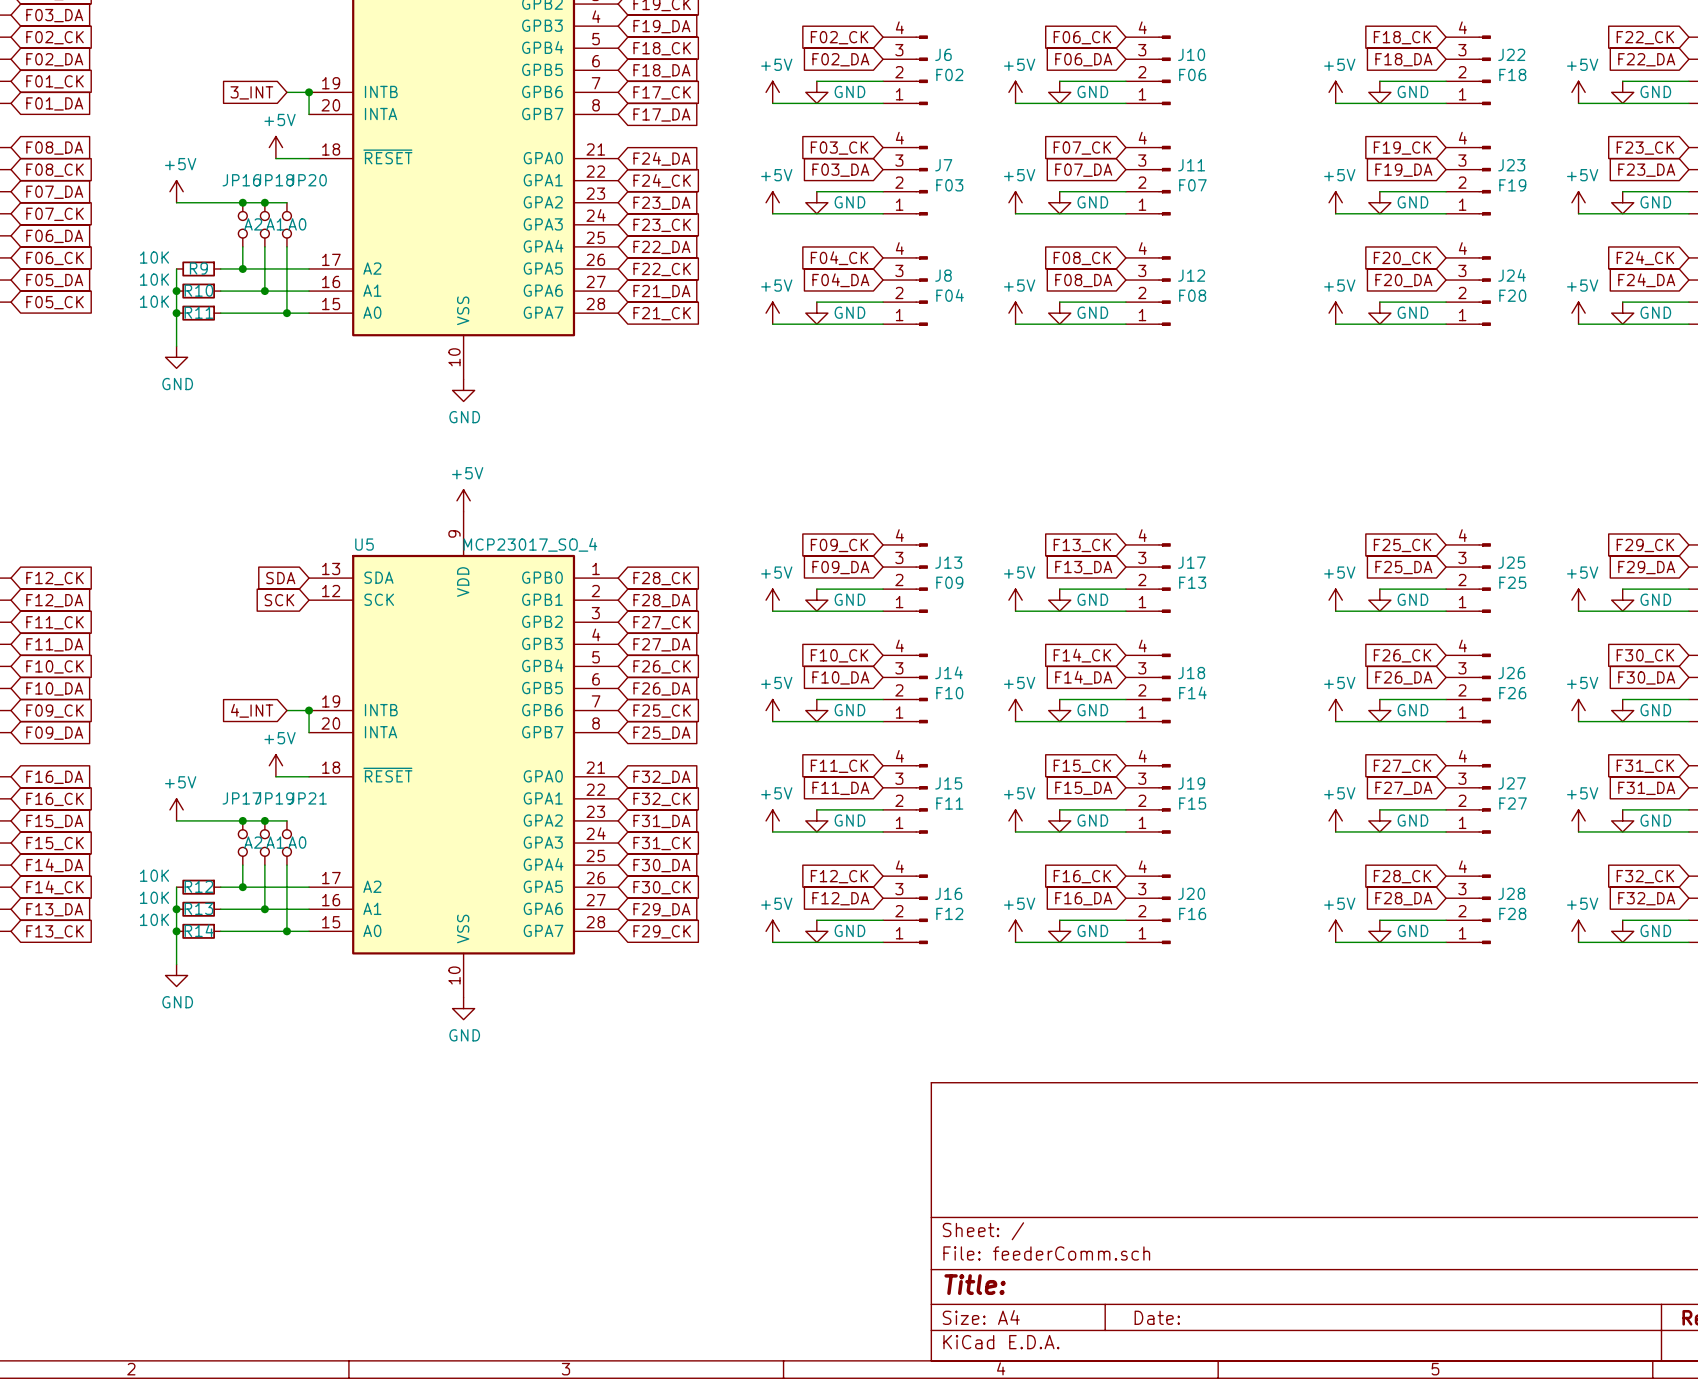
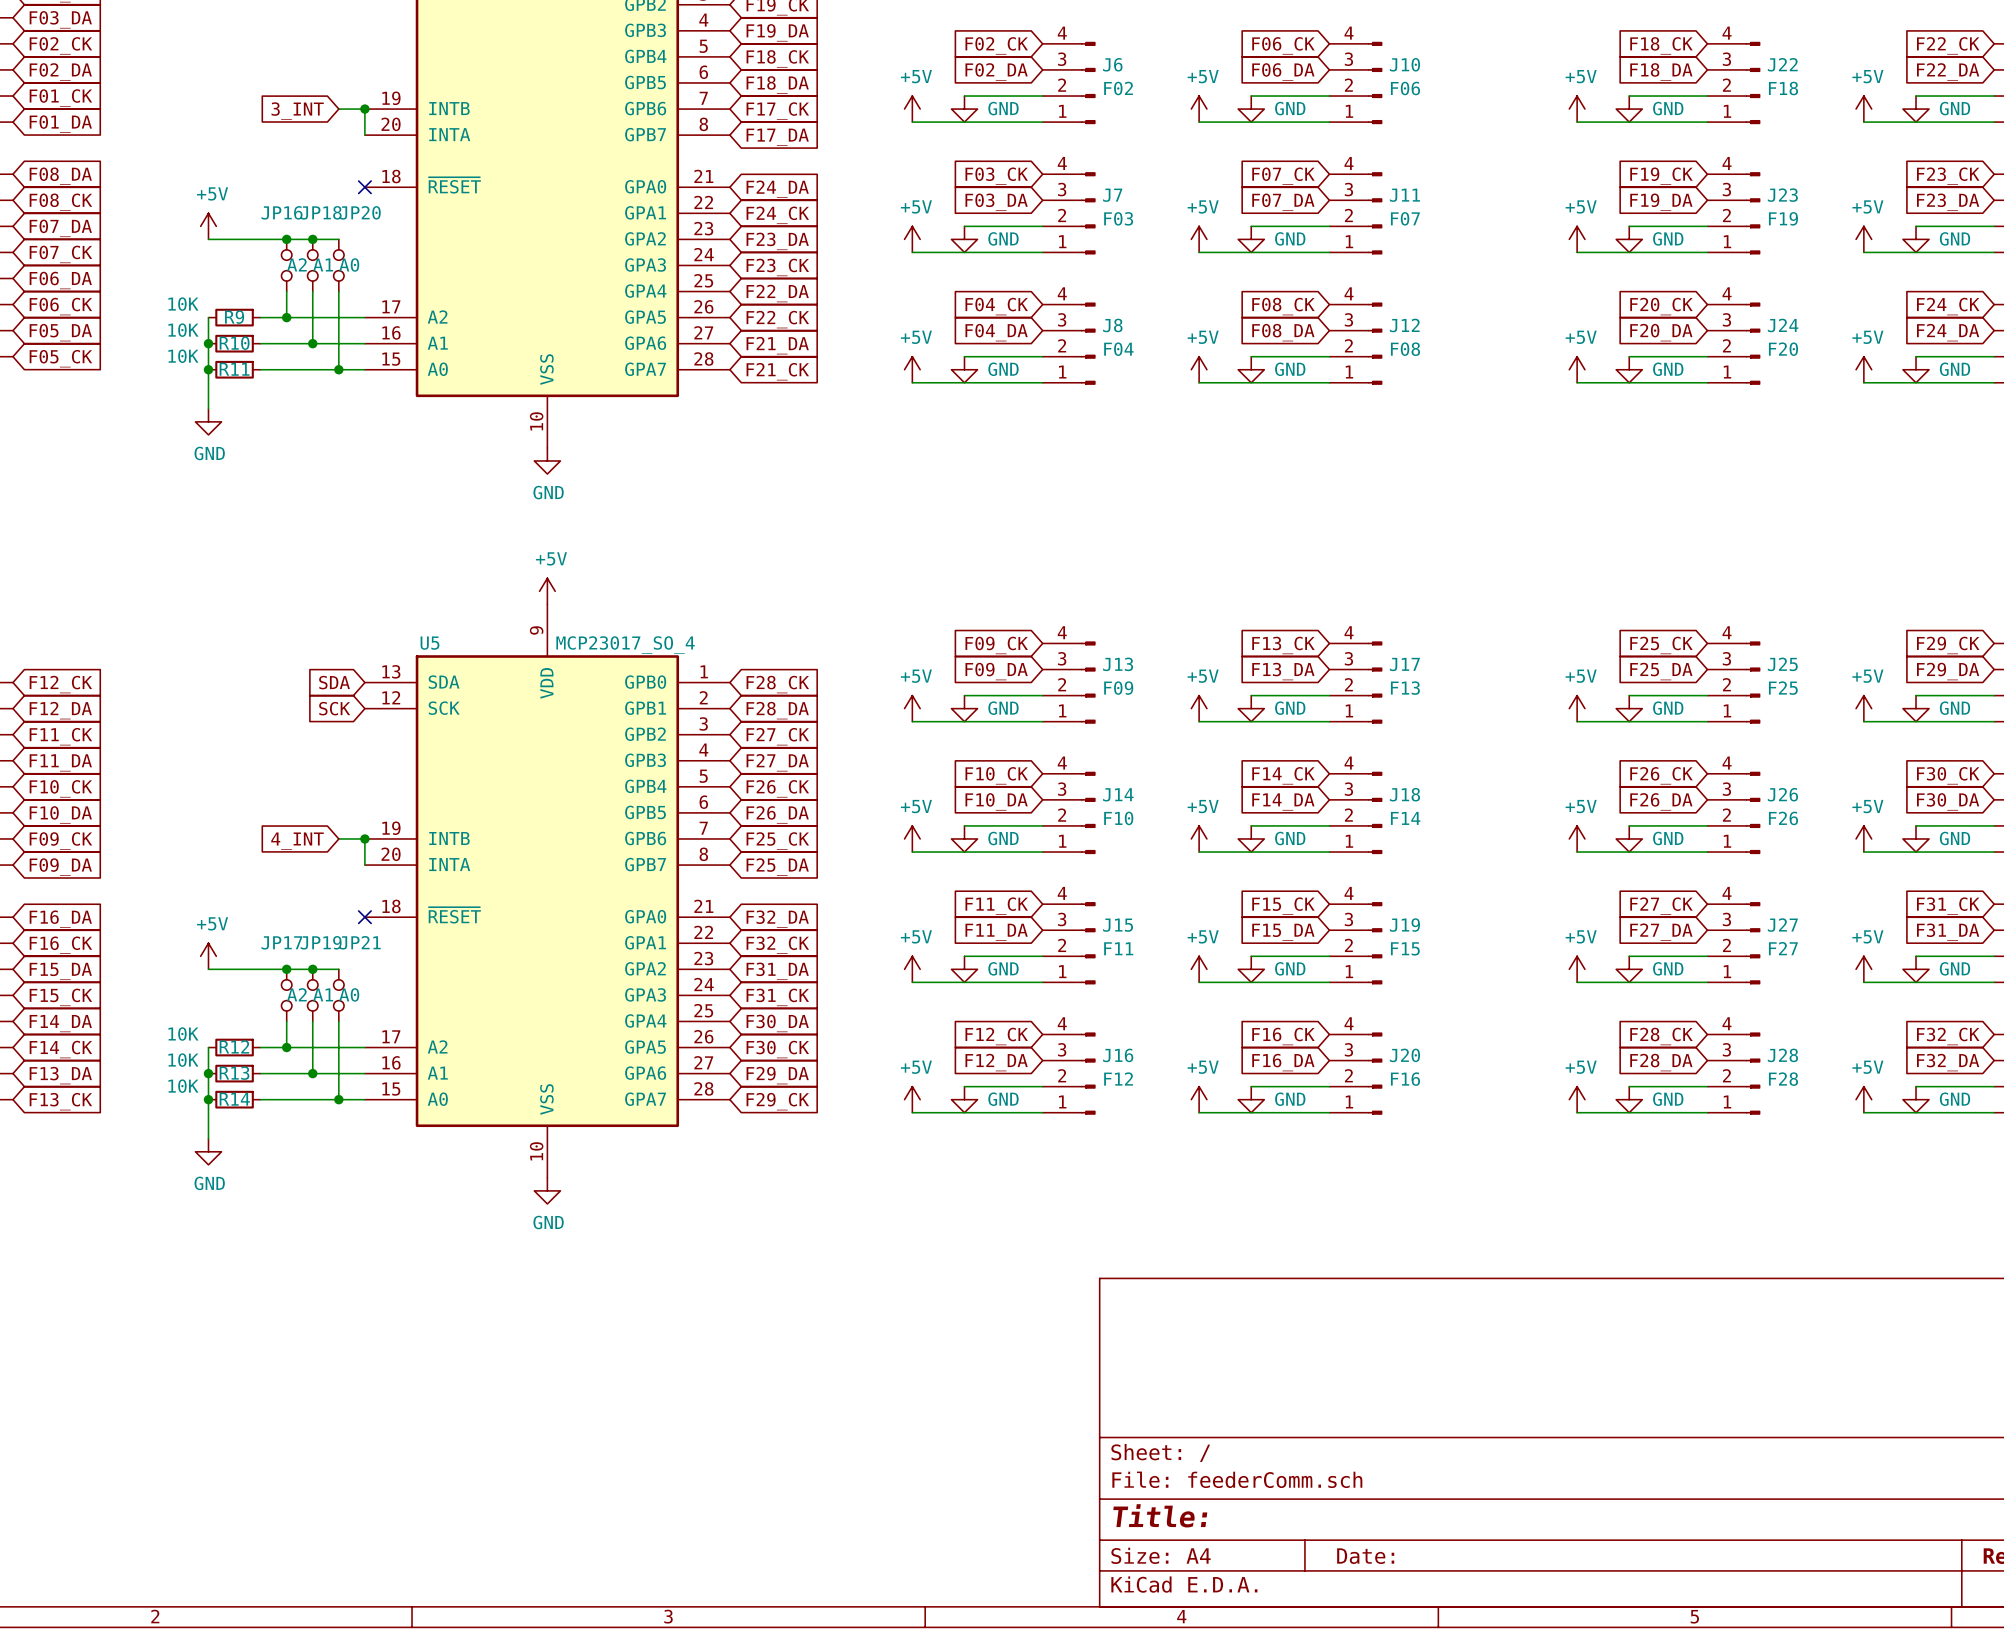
power symbol: +5V (275, 147) -> none
wire: (275, 158) (309, 158) -> none
no-connect mark: none -> (364, 187)
power symbol: +5V (275, 765) -> none
wire: (275, 776) (309, 776) -> none
no-connect mark: none -> (364, 917)

